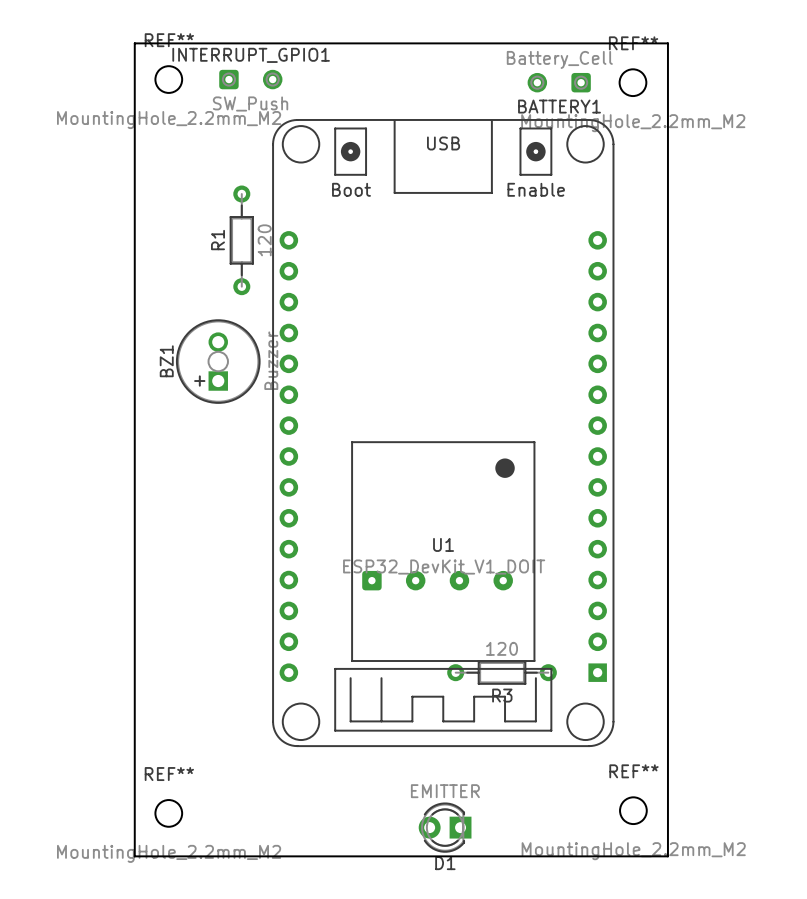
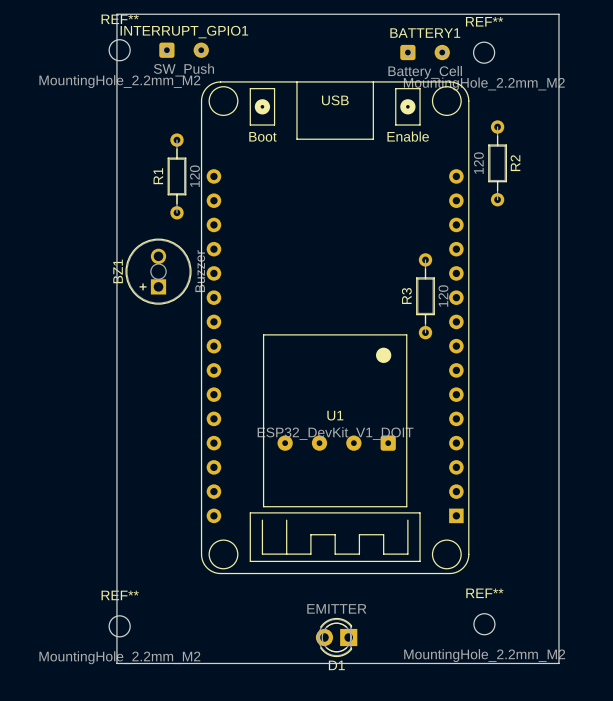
board edge: (134, 43) (667, 43) (667, 856) (134, 856) (134, 43) -> (116, 14) (116, 663) (558, 663) (558, 14) (116, 14)
BATTERY1 rotation: 0° (559, 82) -> 180° (425, 52)
R2: none -> 120 (497, 163)
part rotation: 0° (437, 580) -> 180° (336, 443)
R3 rotation: 0° (502, 672) -> 90° clockwise (425, 296)
R3 position: (502, 672) -> (425, 296)

